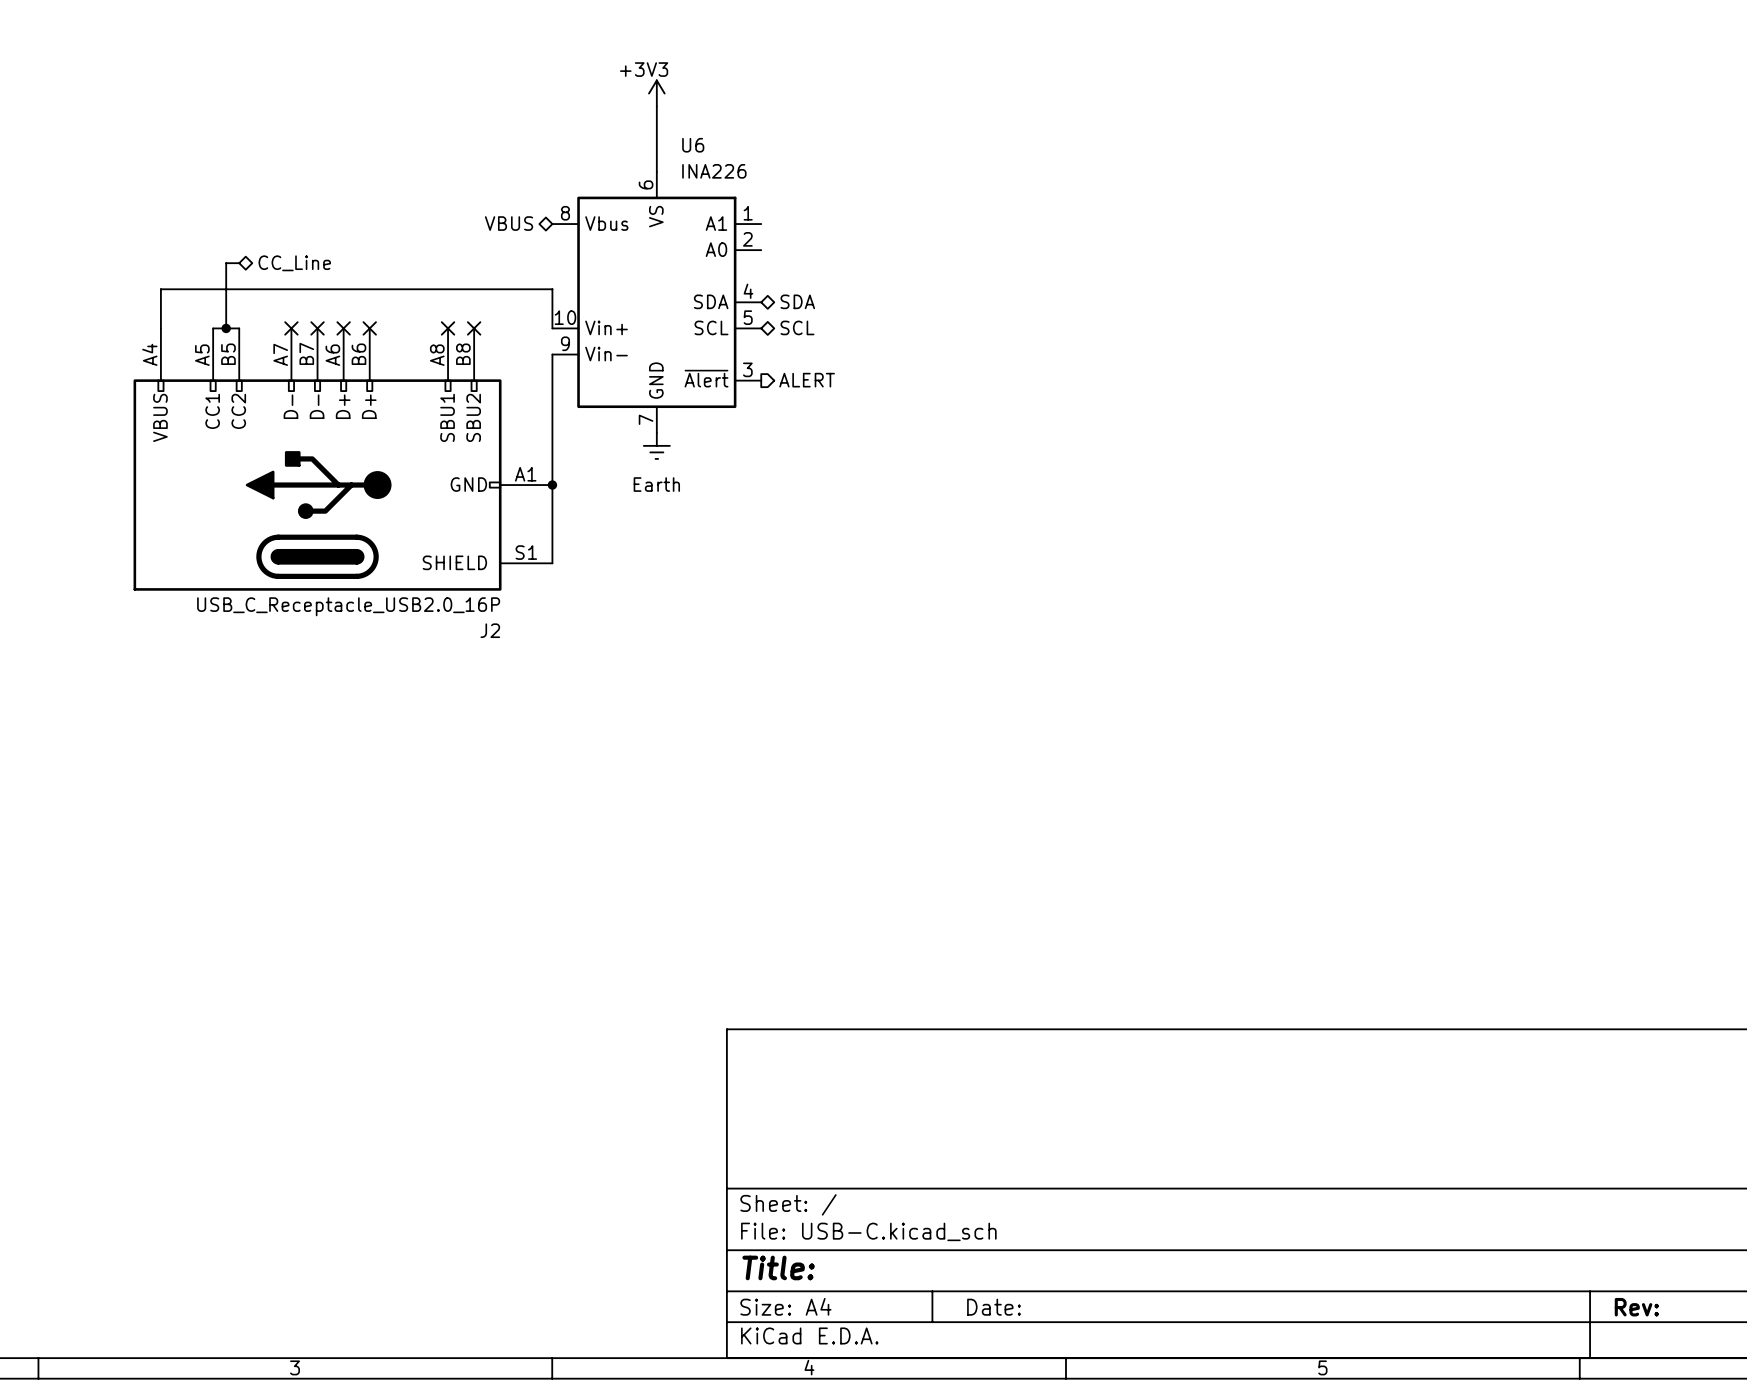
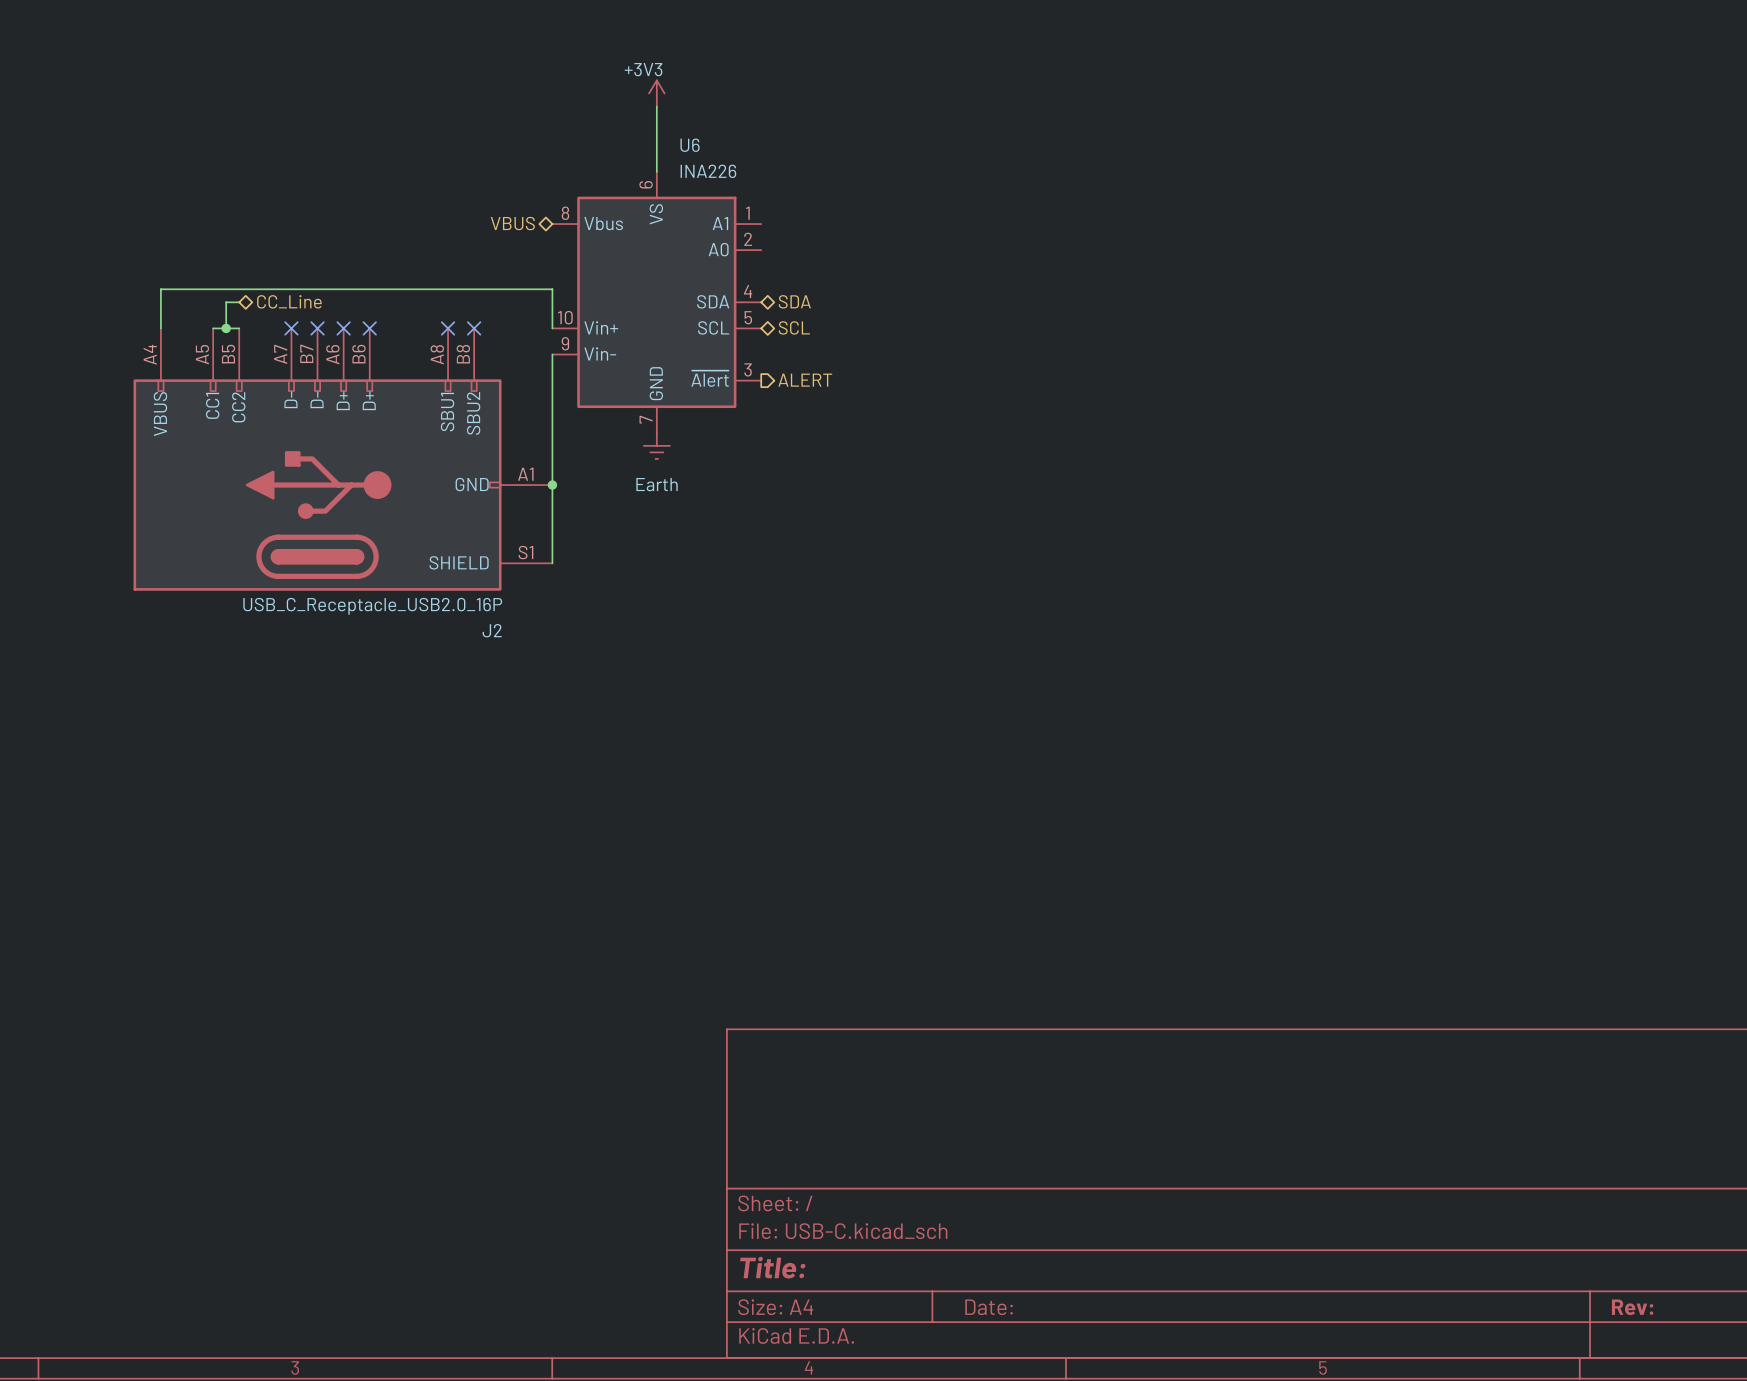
wire: (239, 263) (226, 263) (226, 302) -> (239, 302) (226, 302)
hierarchical label position: CC_Line (294, 263) -> CC_Line (289, 301)

